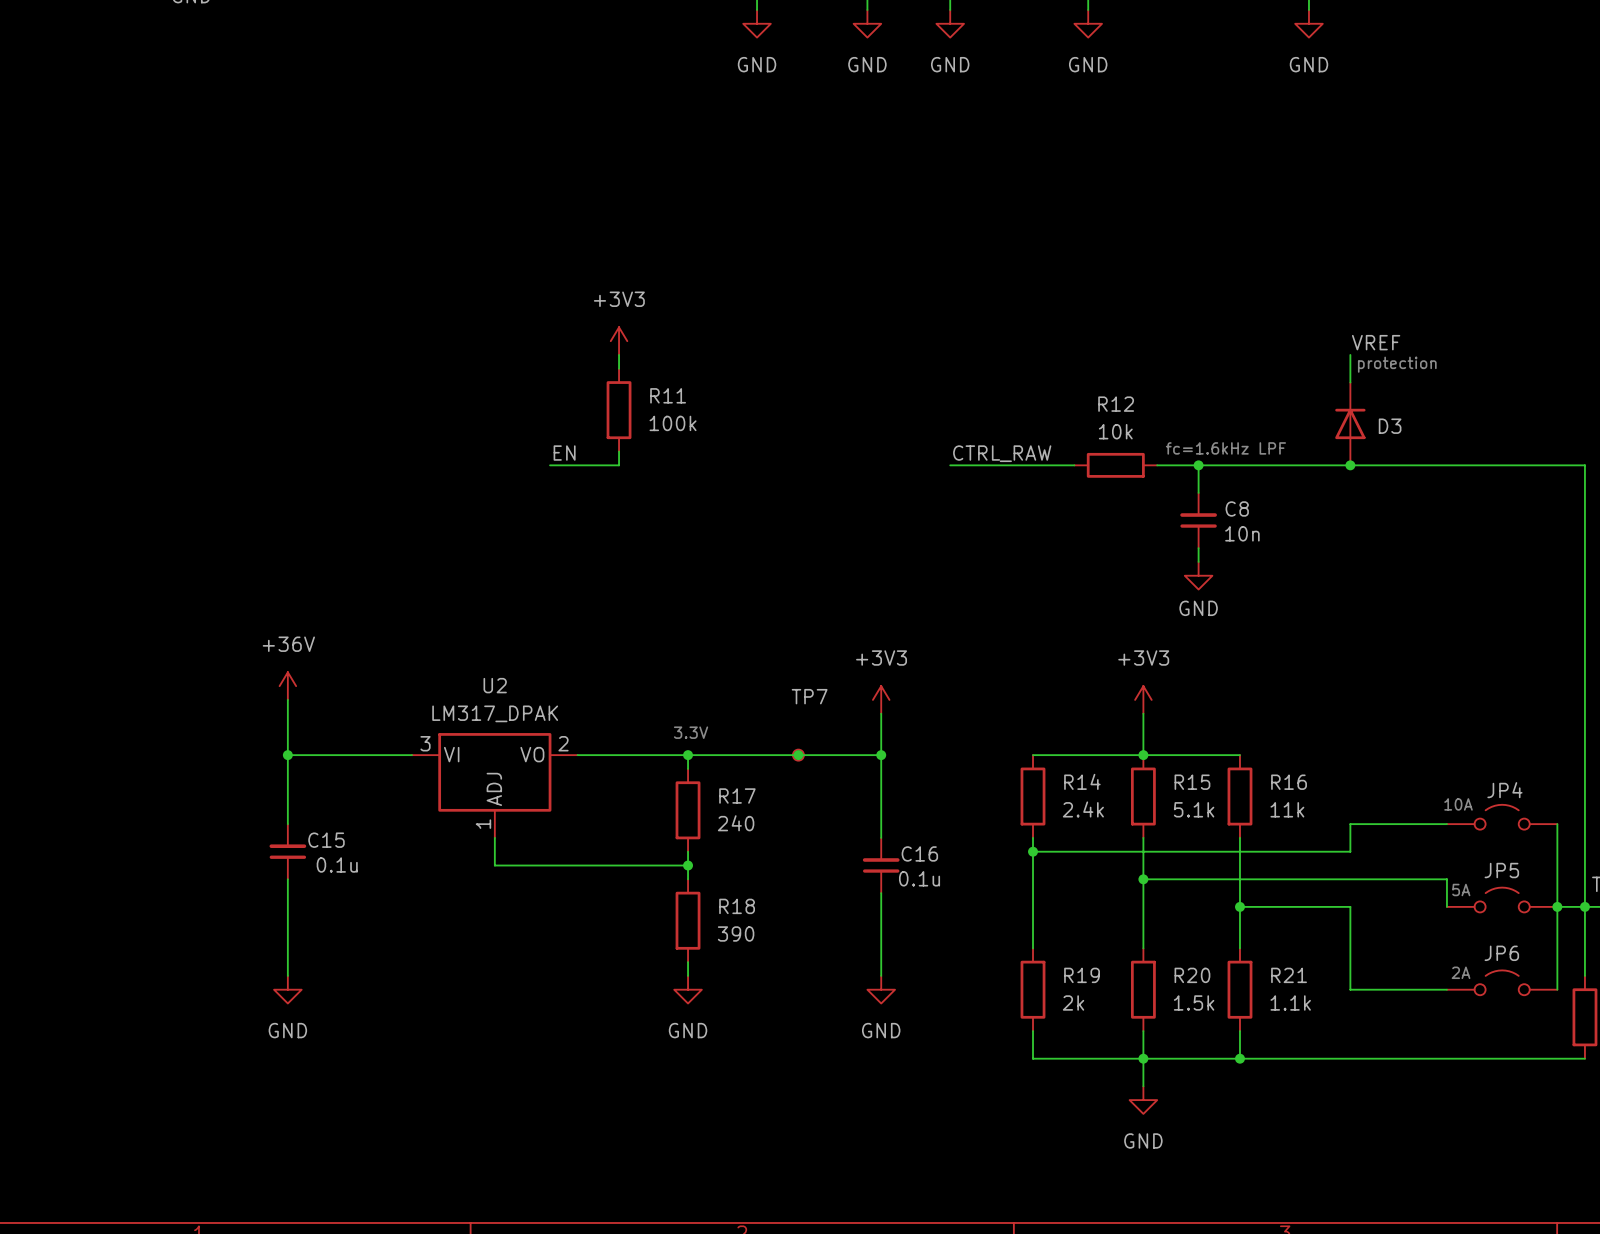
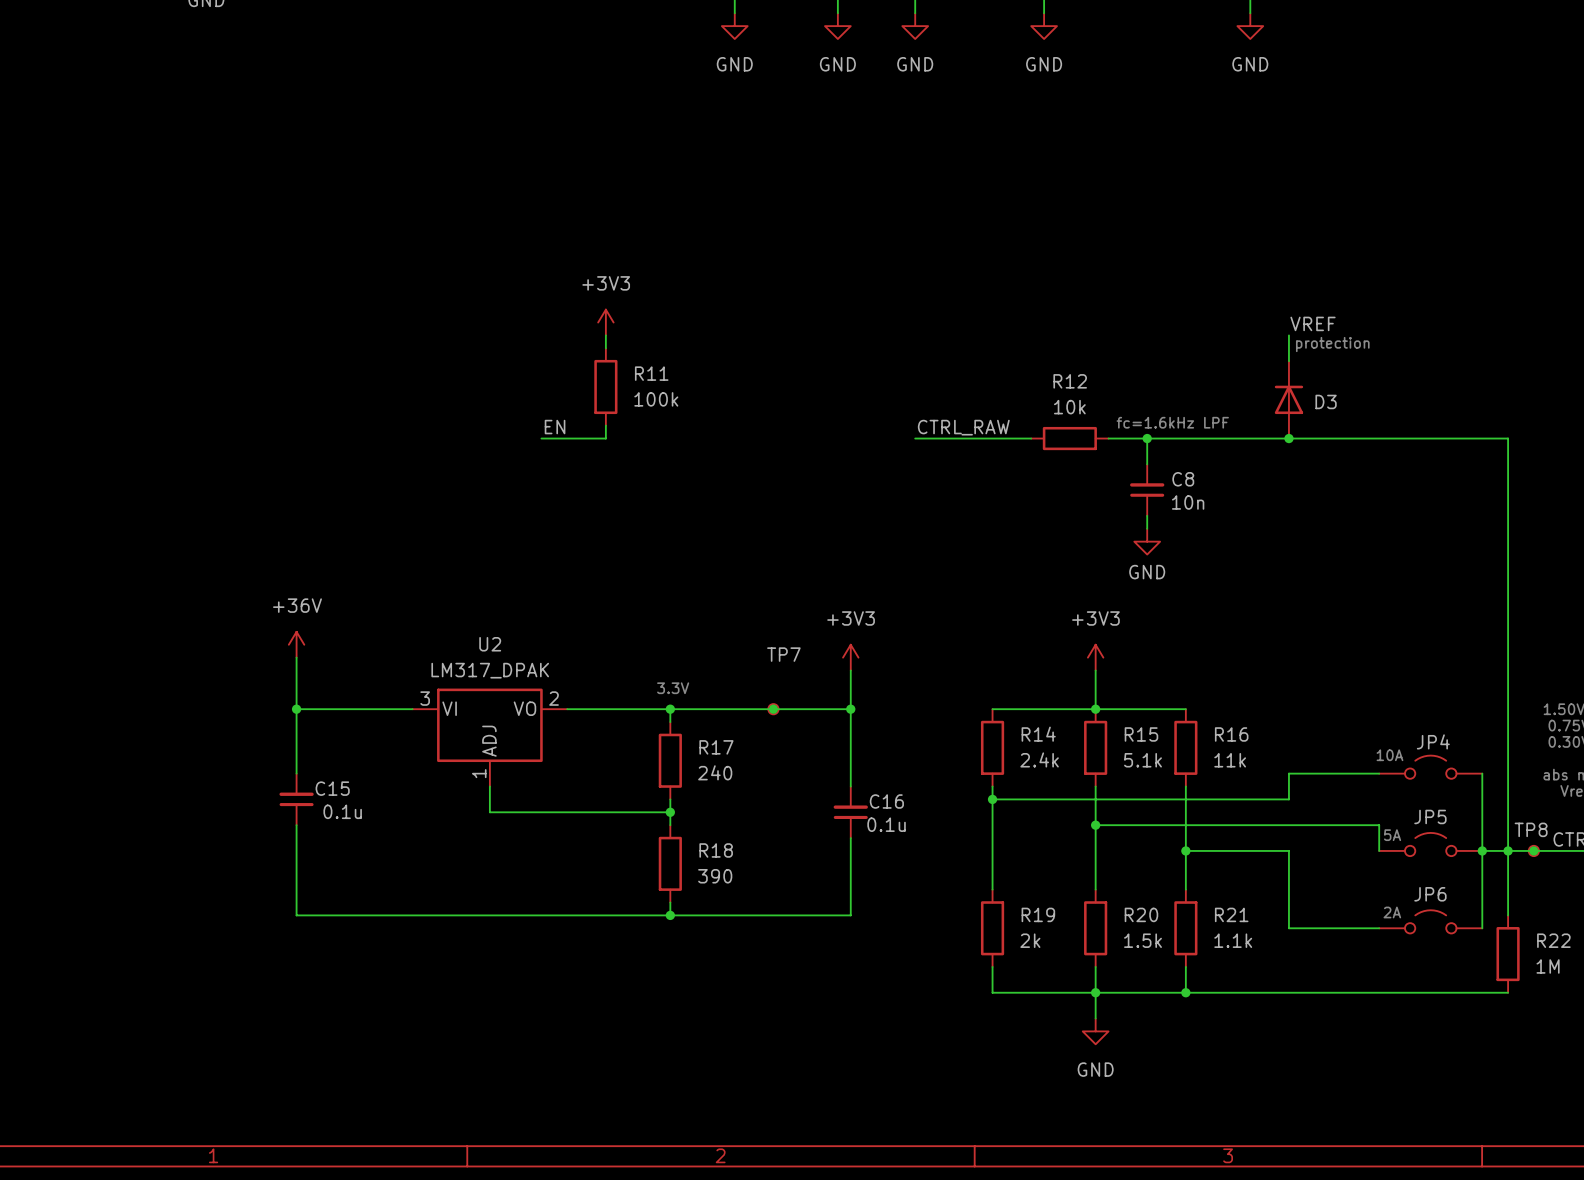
wire: none -> (296, 915) (850, 915)
junction: none -> (670, 915)
power symbol: GND (287, 989) -> none
power symbol: GND (688, 989) -> none
power symbol: GND (881, 989) -> none

